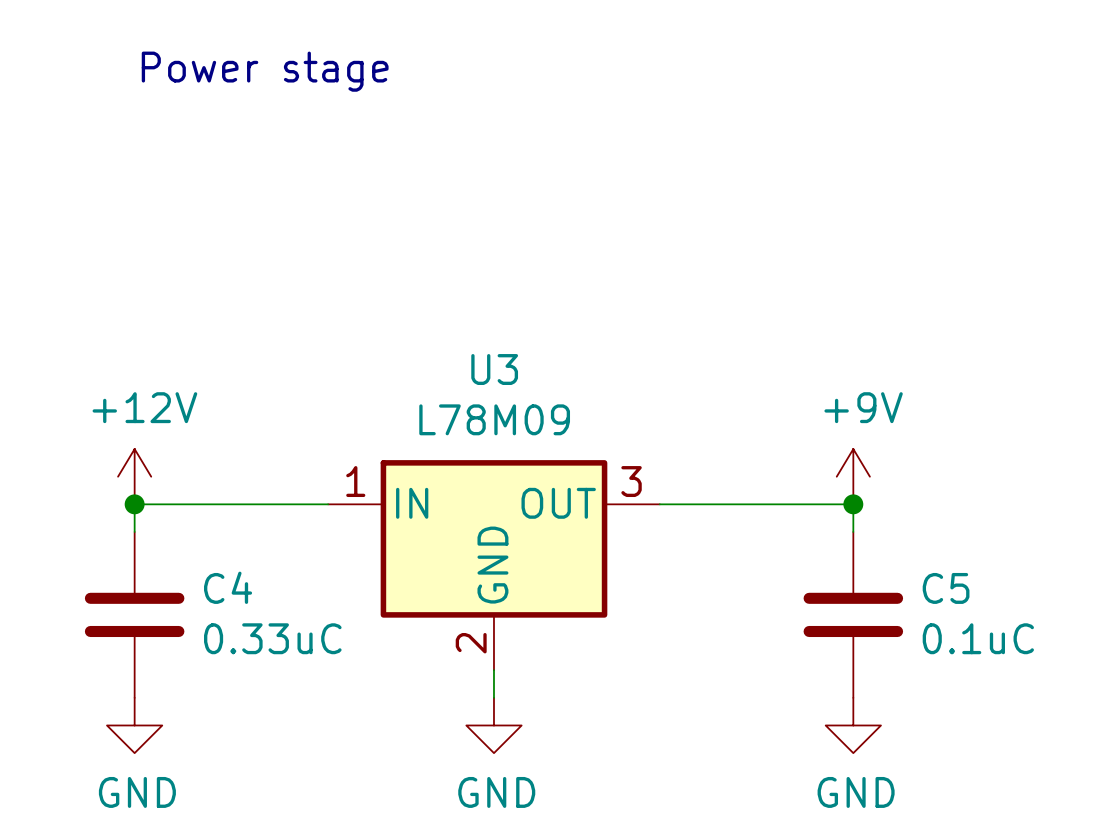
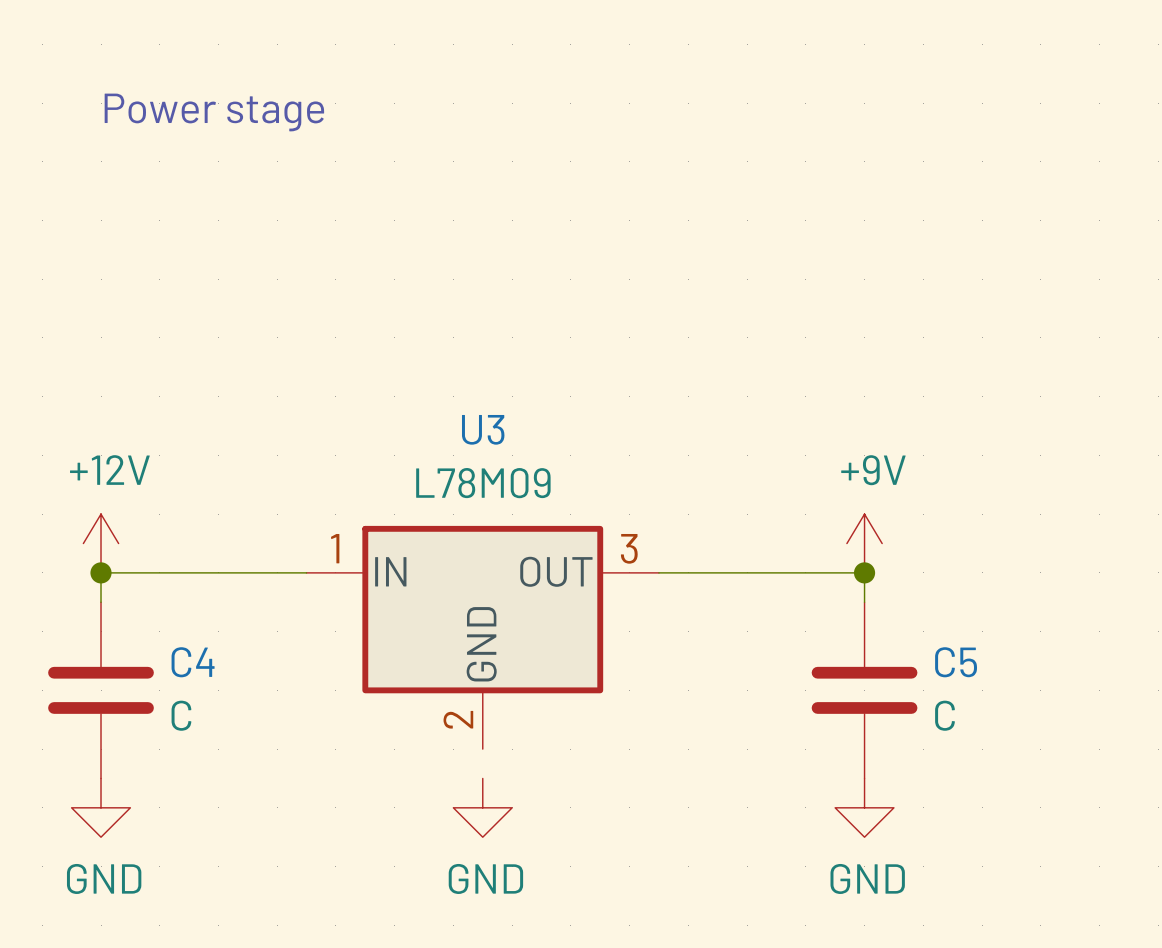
C4 value: 0.33uC (272, 638) -> C (181, 715)
C5 value: 0.1uC (978, 638) -> C (944, 715)
wire: (493, 670) (493, 697) -> none

